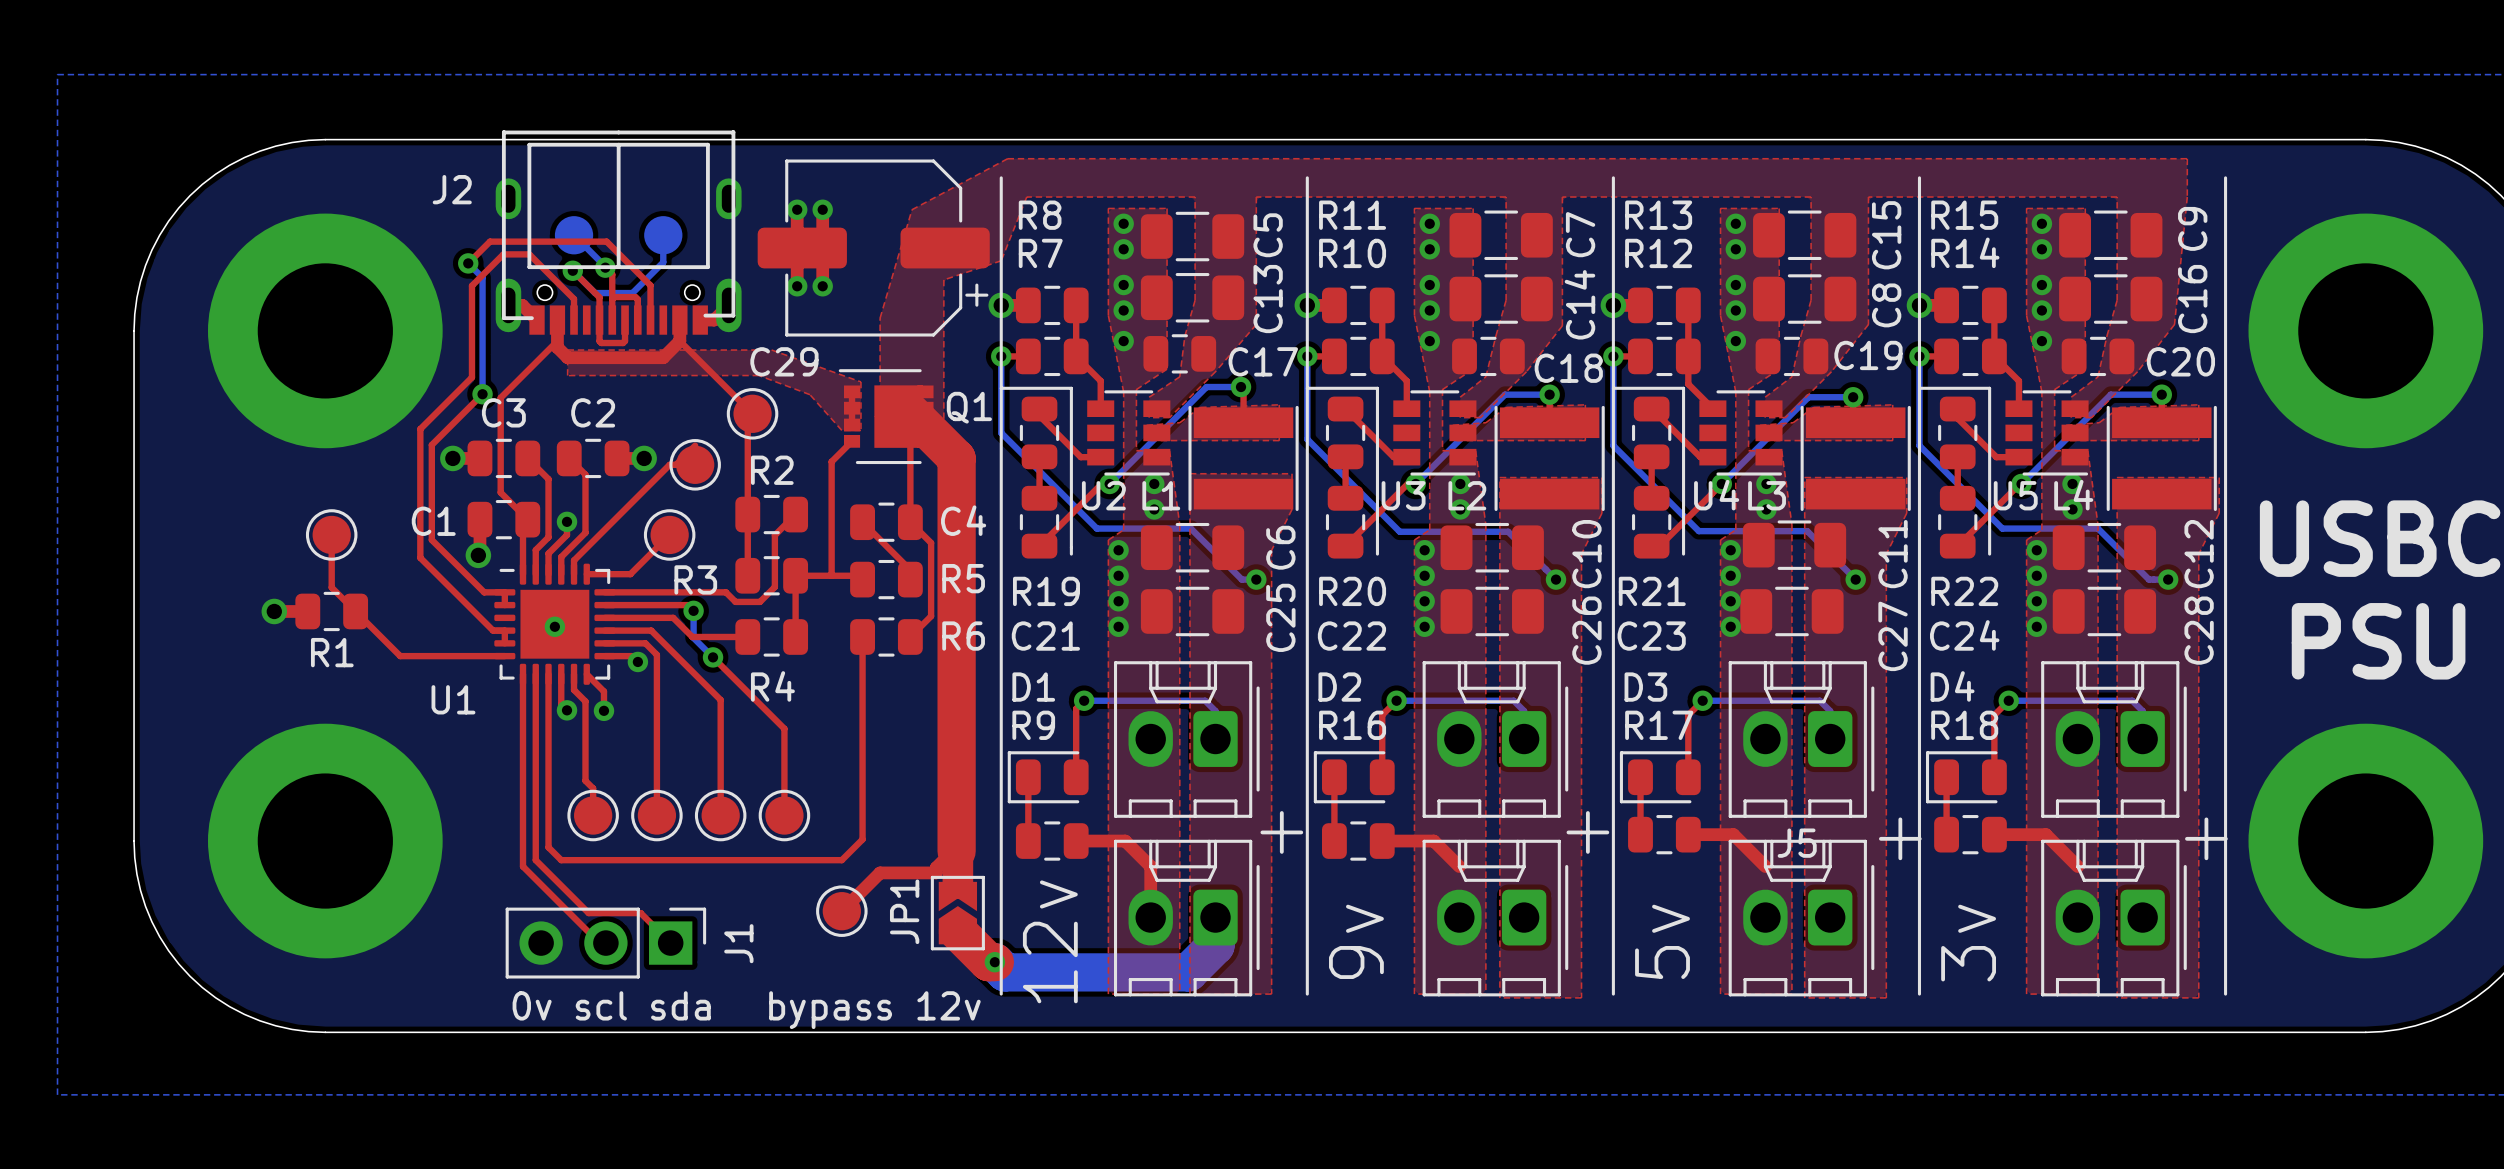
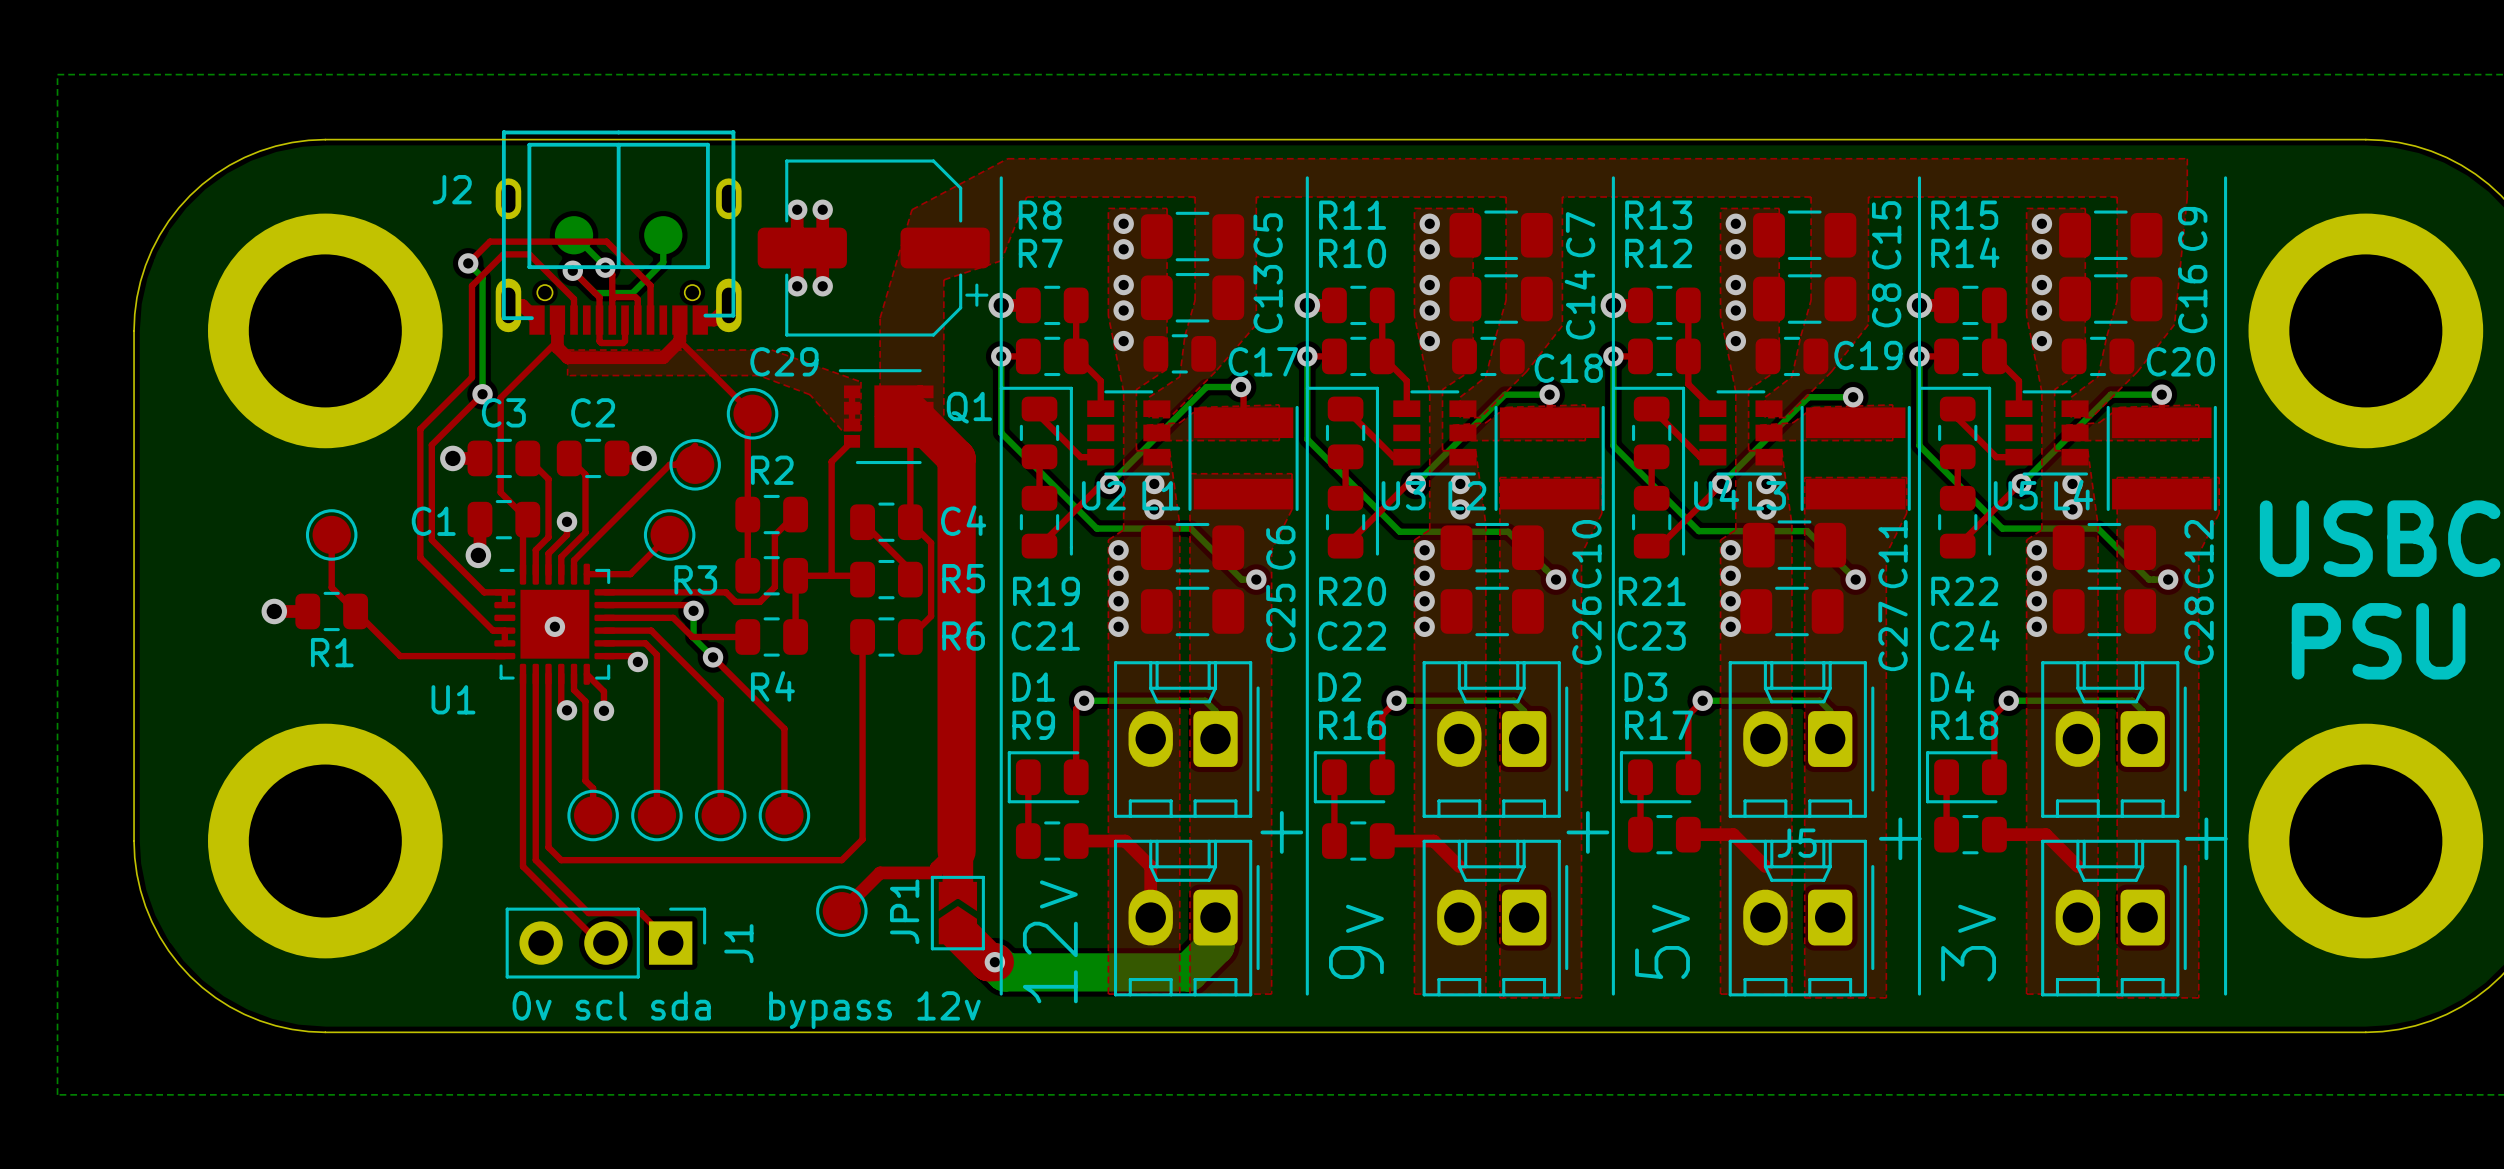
part footprint: [208, 213, 443, 449] -> [208, 213, 443, 449]
part footprint: [2248, 213, 2484, 449] -> [2248, 213, 2484, 449]
part footprint: [208, 723, 443, 959] -> [208, 723, 443, 959]
part footprint: [2248, 723, 2484, 959] -> [2248, 723, 2484, 959]

